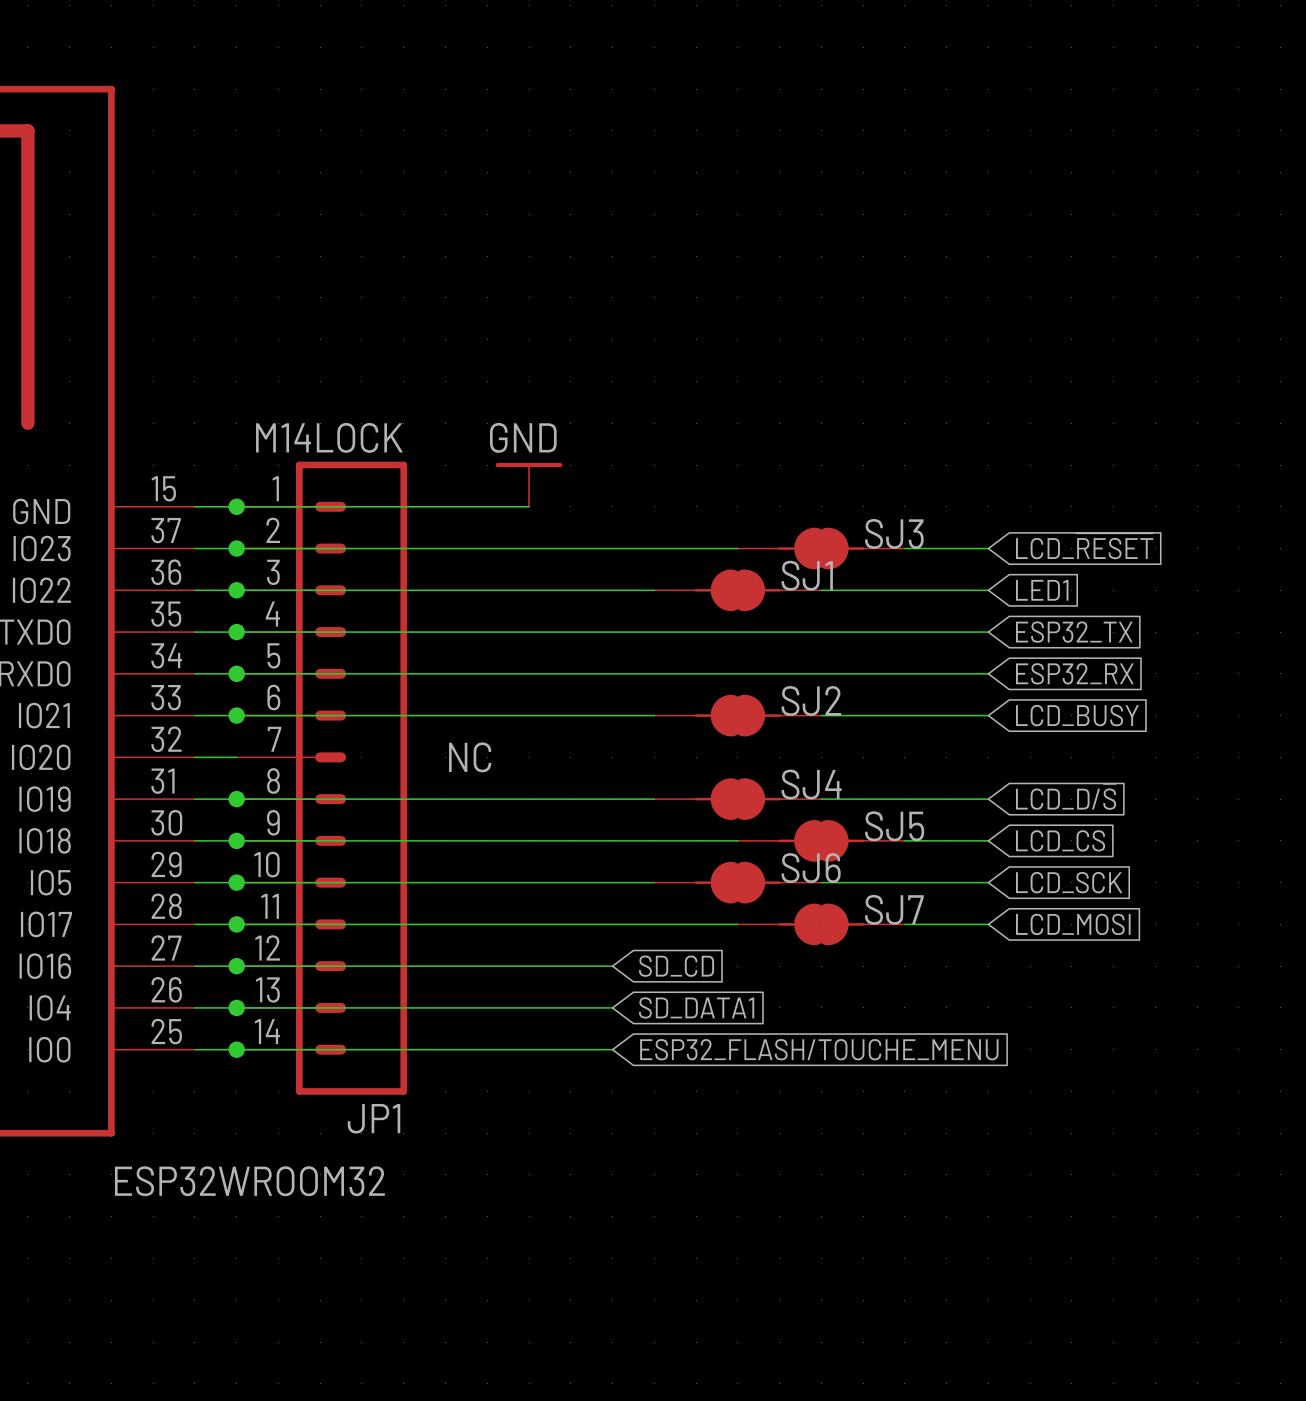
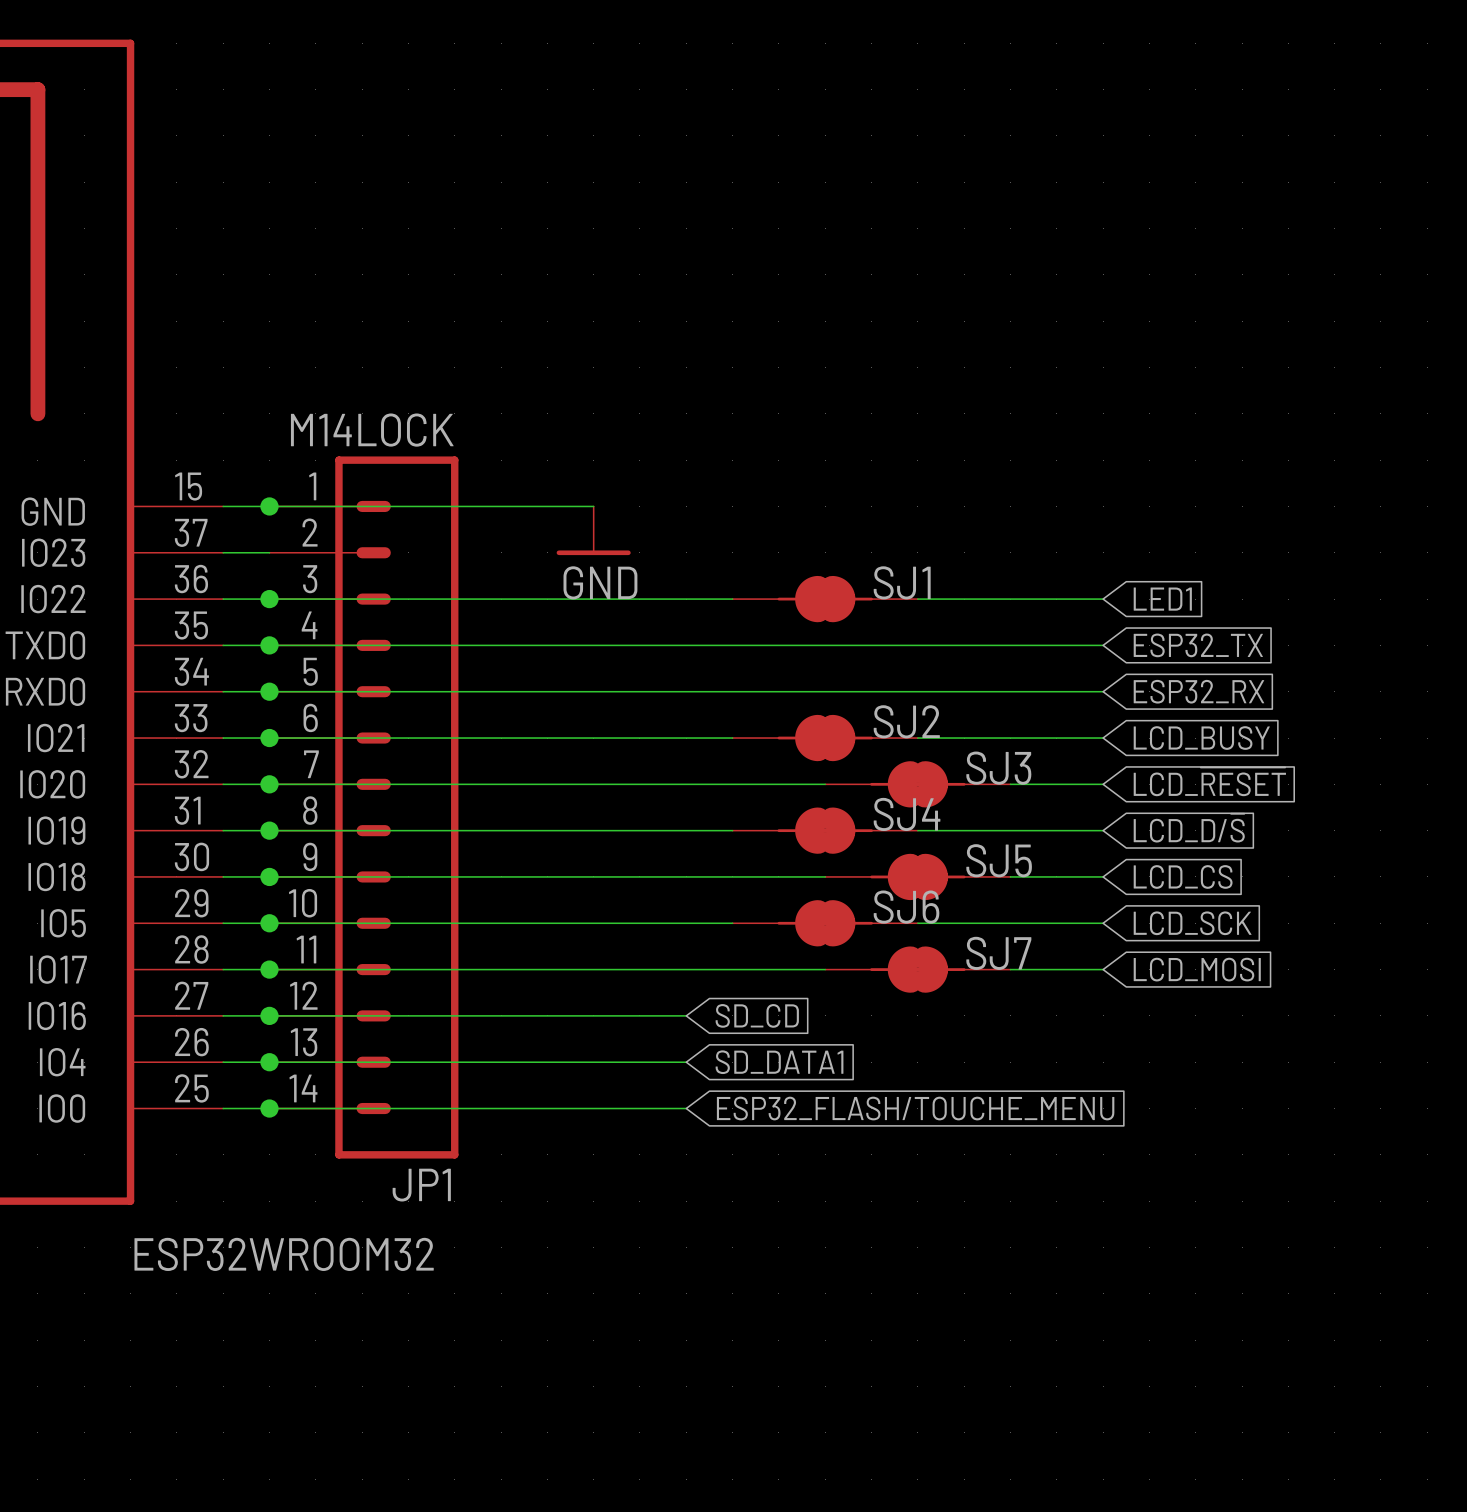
power symbol rotation: 0° (529, 465) -> 180° (593, 552)
power symbol position: GND (529, 484) -> GND (593, 530)
global label position: LCD_~{RESET} (1084, 546) -> LCD_~{RESET} (1209, 781)
wire: (236, 548) (737, 548) -> (269, 784) (825, 784)
junction: (236, 548) -> none
SJ3 position: (821, 548) -> (917, 784)
wire: (904, 548) (988, 548) -> (1010, 784) (1103, 784)
junction: none -> (269, 784)
text: NC (470, 757) -> none

